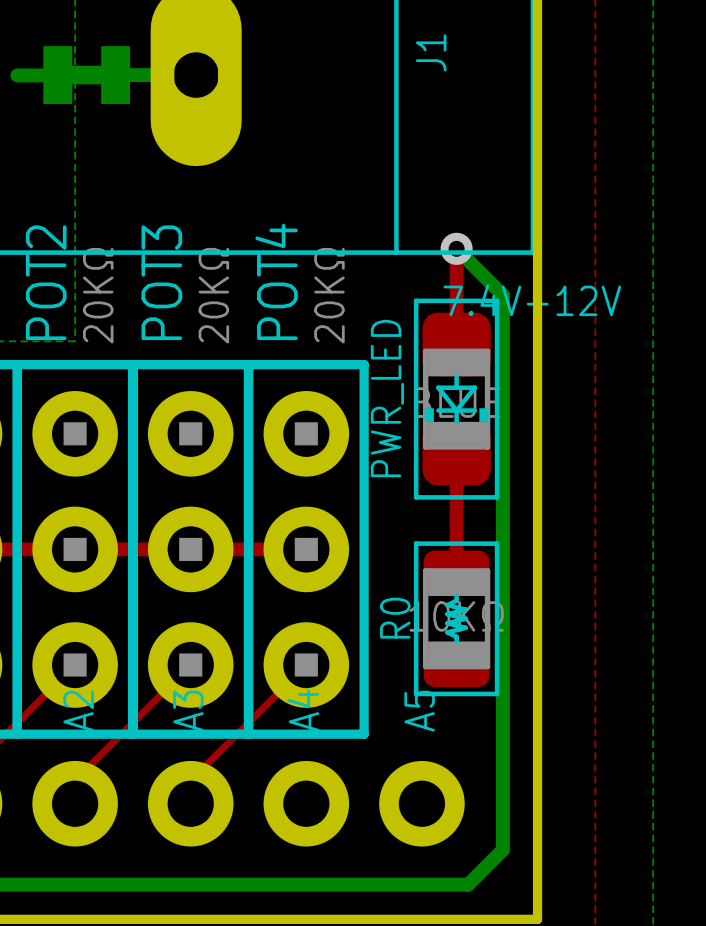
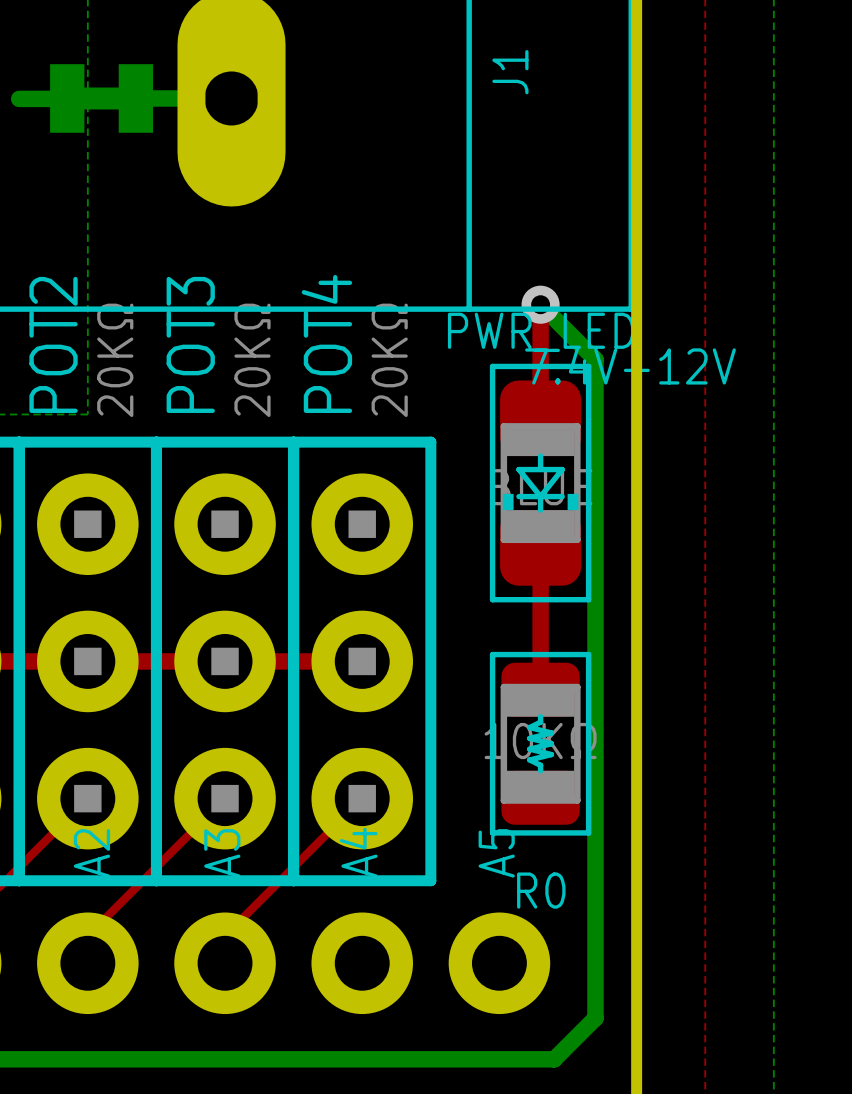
PWR_LED name rotation: 0° (387, 398) -> 90° clockwise (541, 332)
R0 name rotation: 0° (395, 618) -> 90° clockwise (541, 890)
R0 name position: R0 (395, 618) -> R0 (541, 890)

